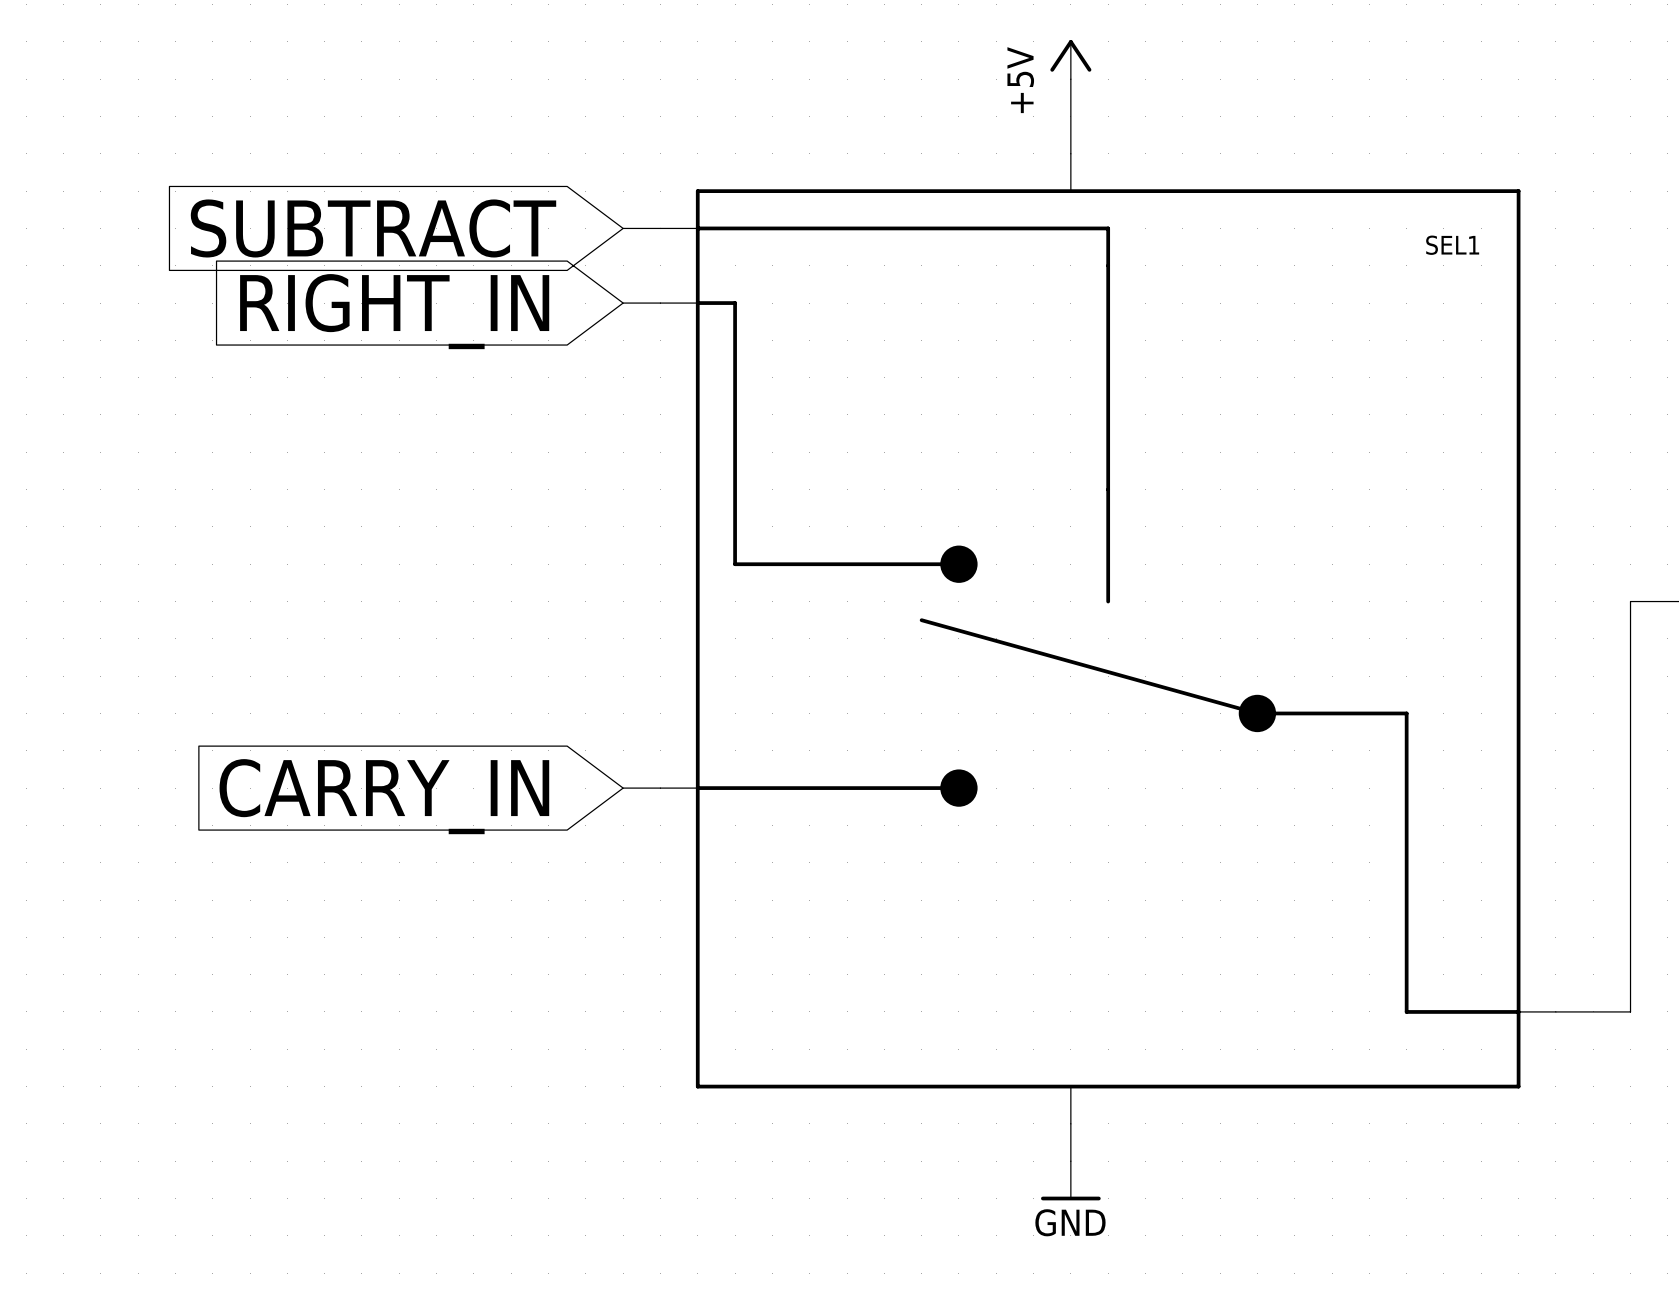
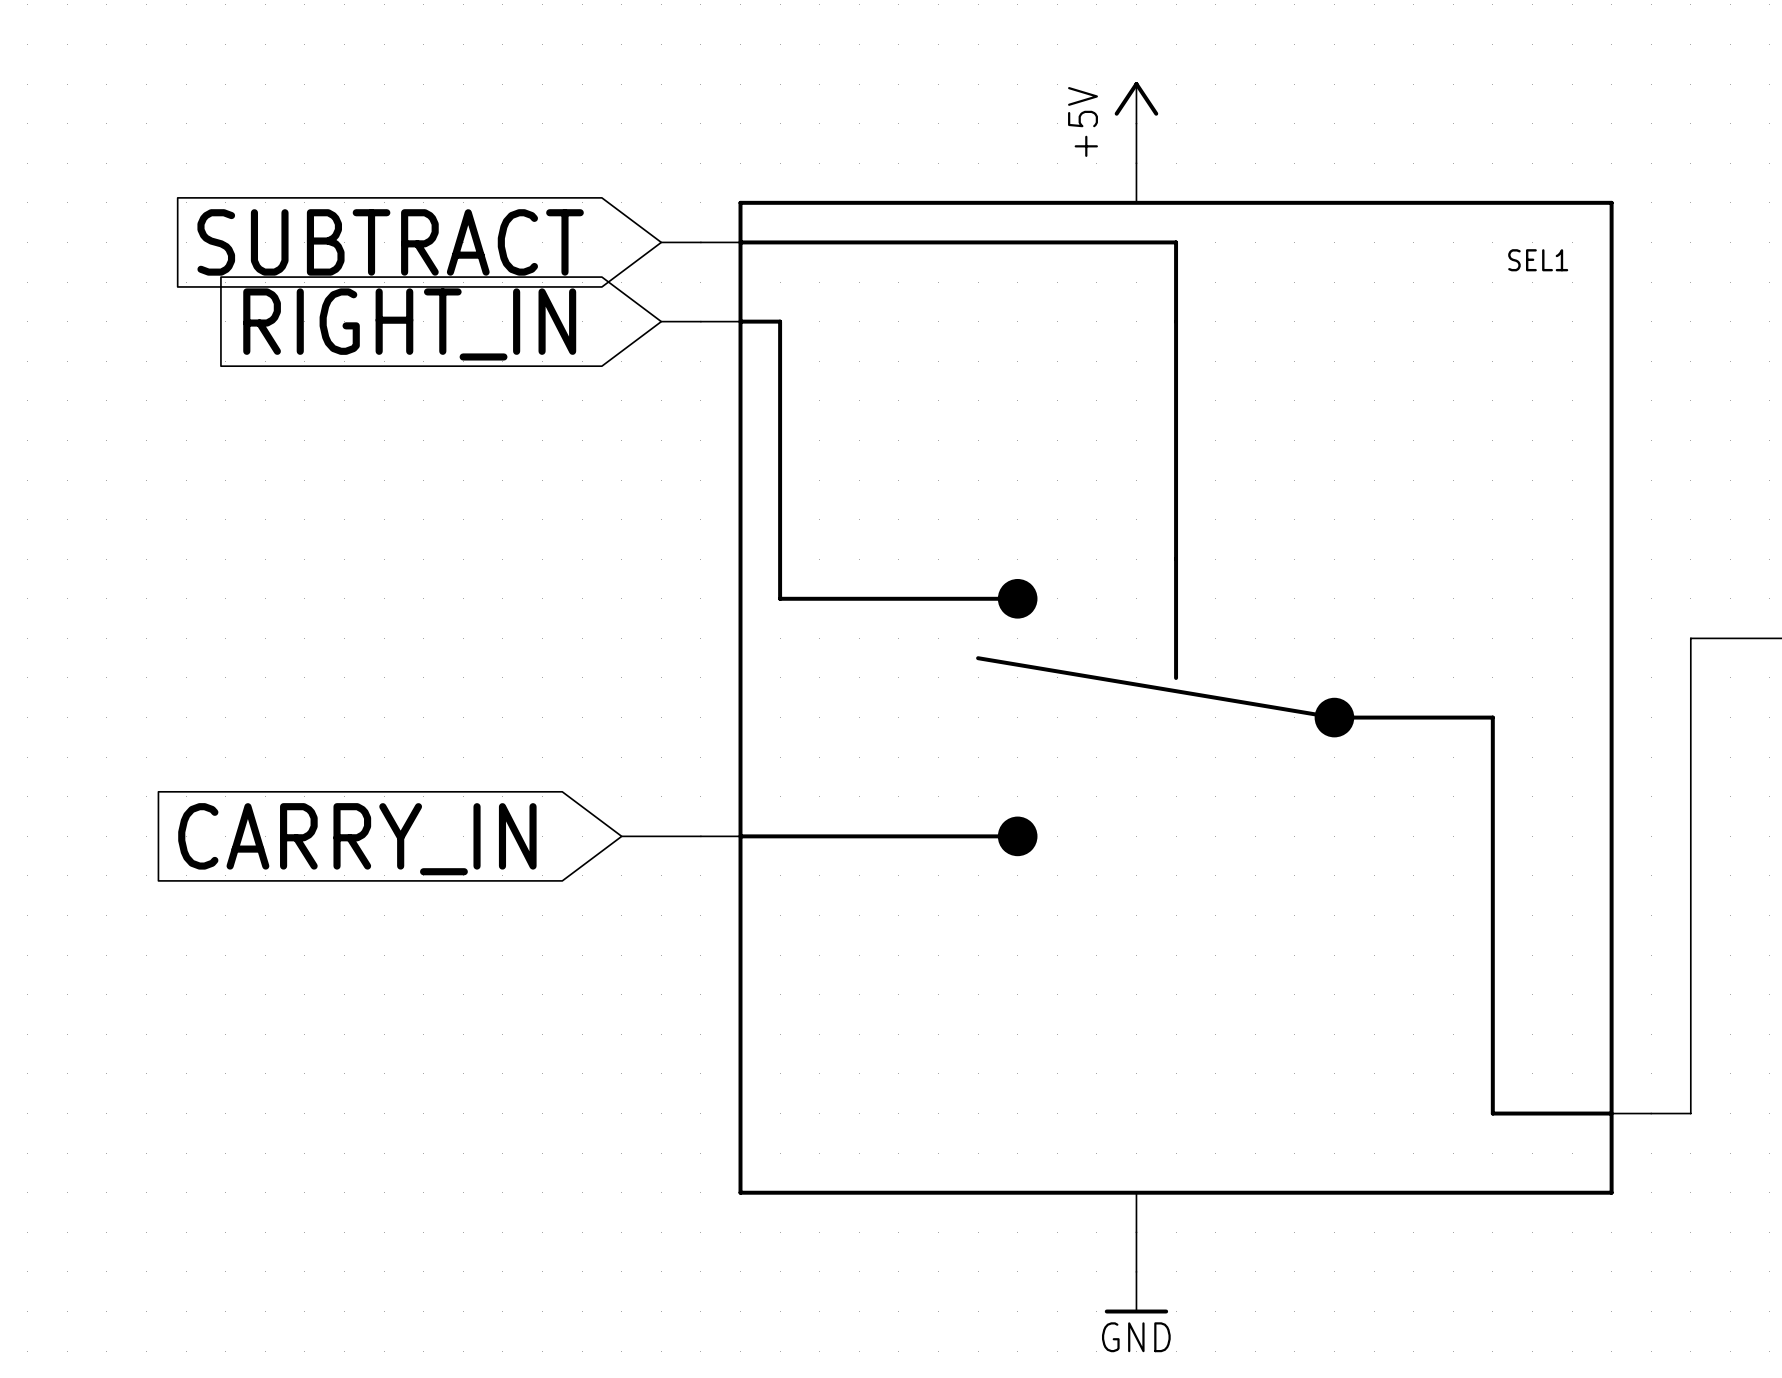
power symbol position: +5V (1070, 59) -> +5V (1136, 102)
SEL1 symbol: [660, 153, 1556, 1124] -> [700, 163, 1652, 1233]
wire: (1630, 601) (1630, 1011) (1555, 1011) -> (1730, 638) (1690, 638) (1690, 1113) (1651, 1113)
wire: none -> (621, 836) (661, 836)
global label position: CARRY_IN (384, 796) -> CARRY_IN (357, 839)
power symbol position: GND (1070, 1180) -> GND (1136, 1292)

